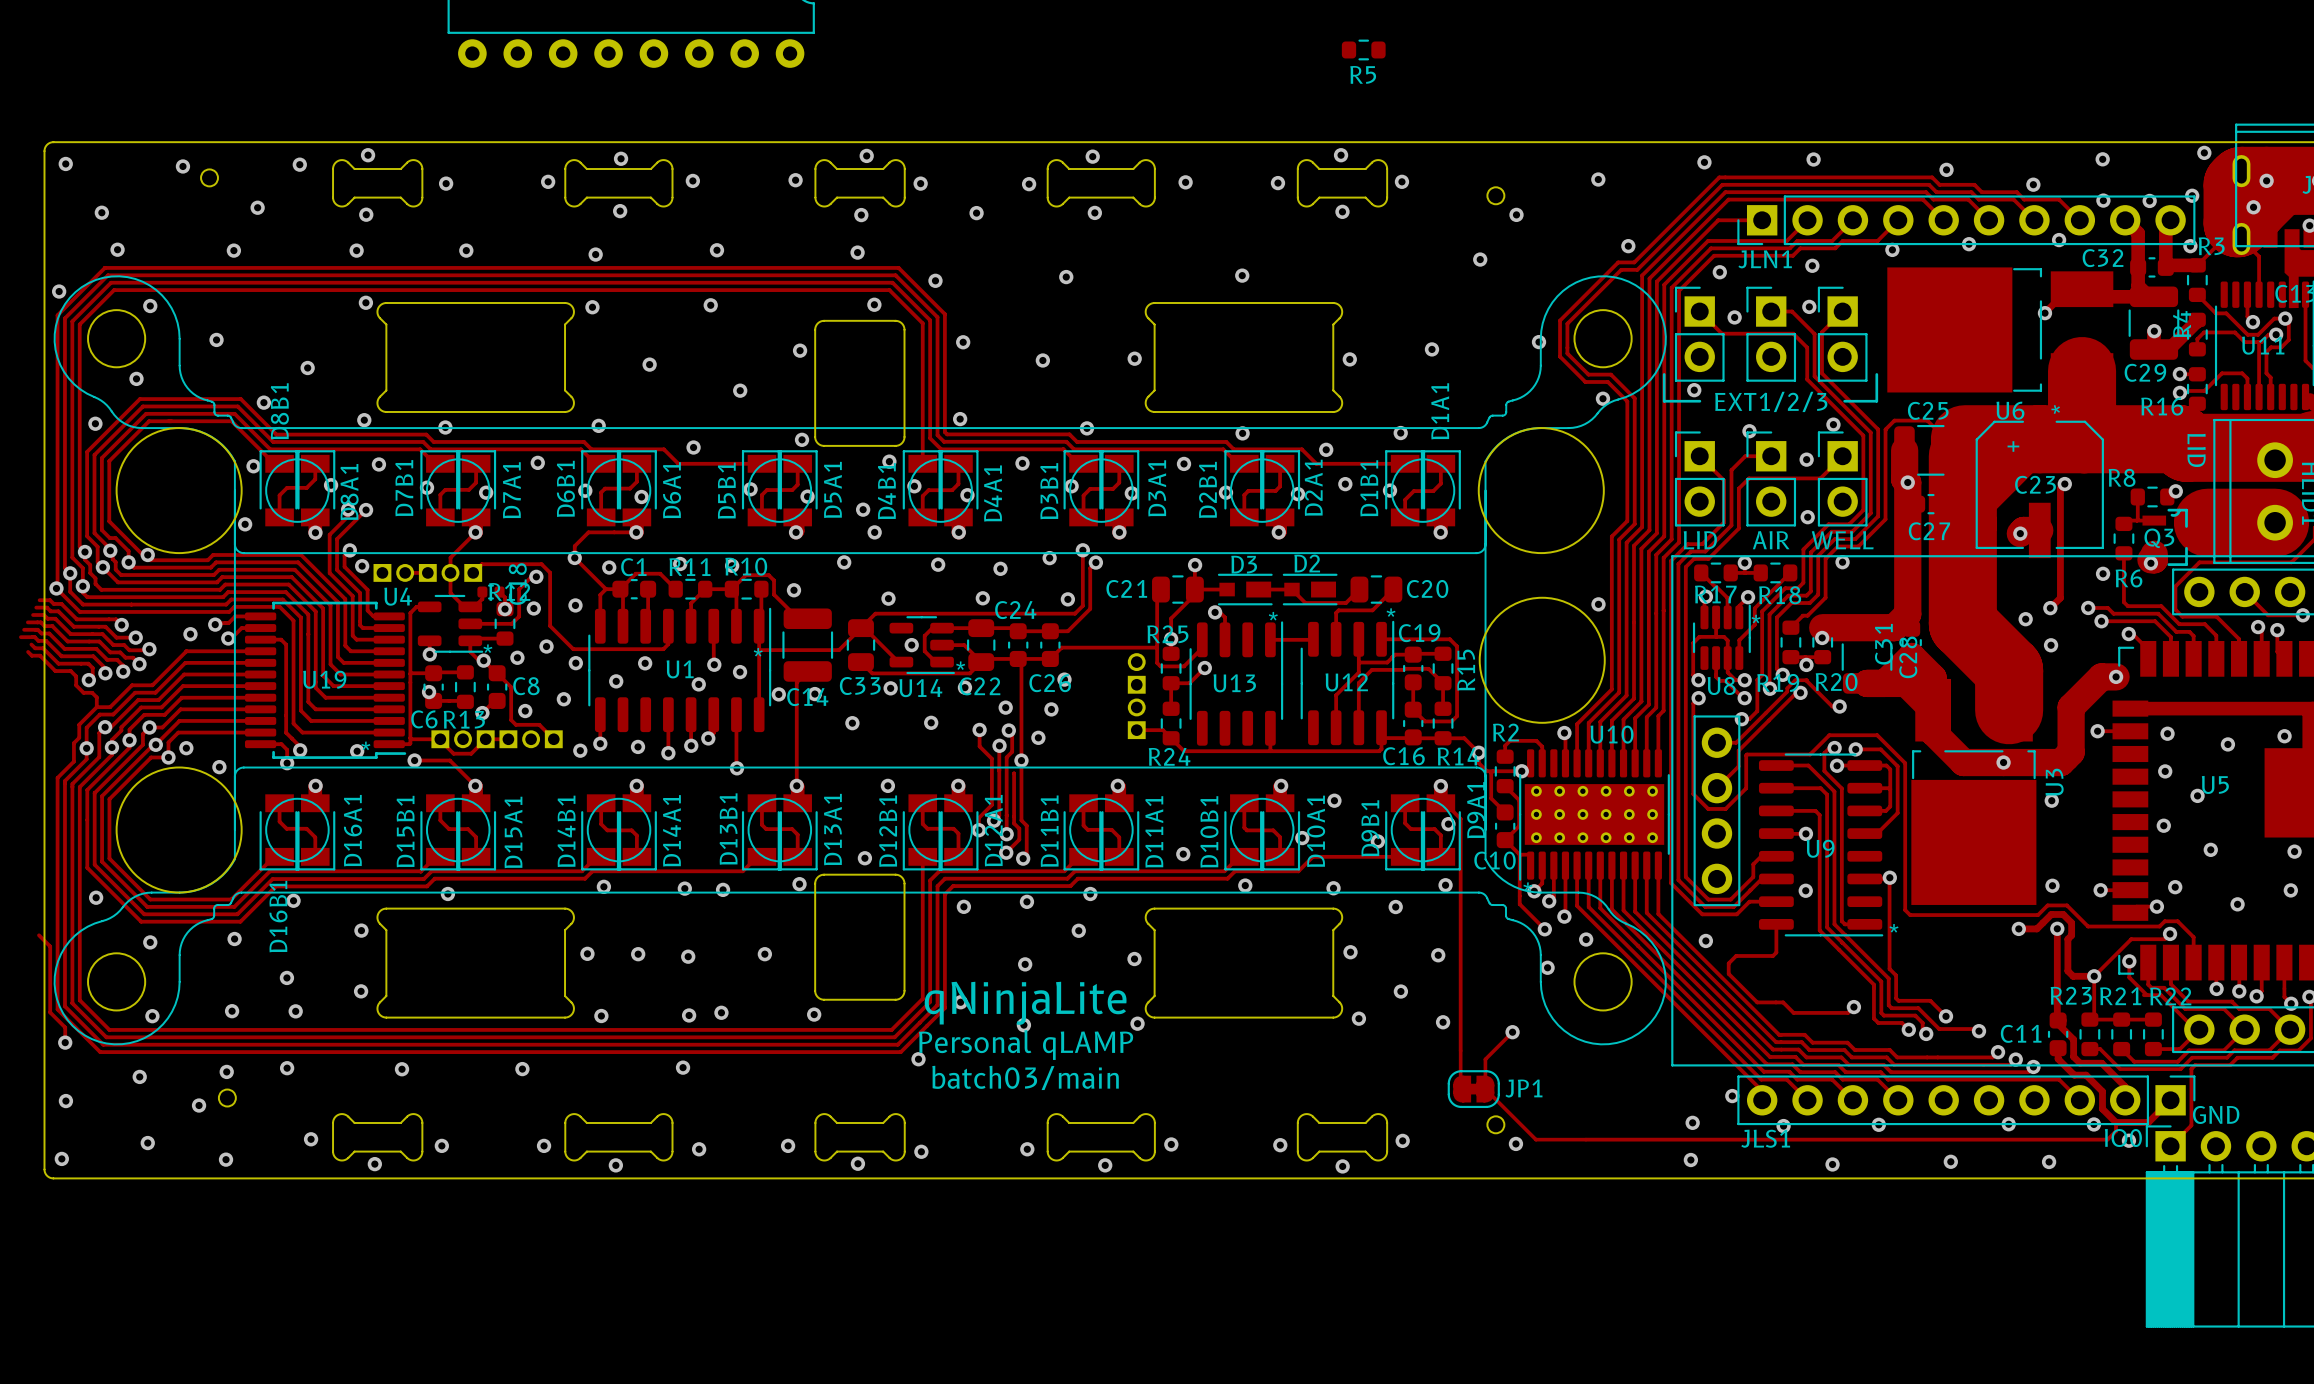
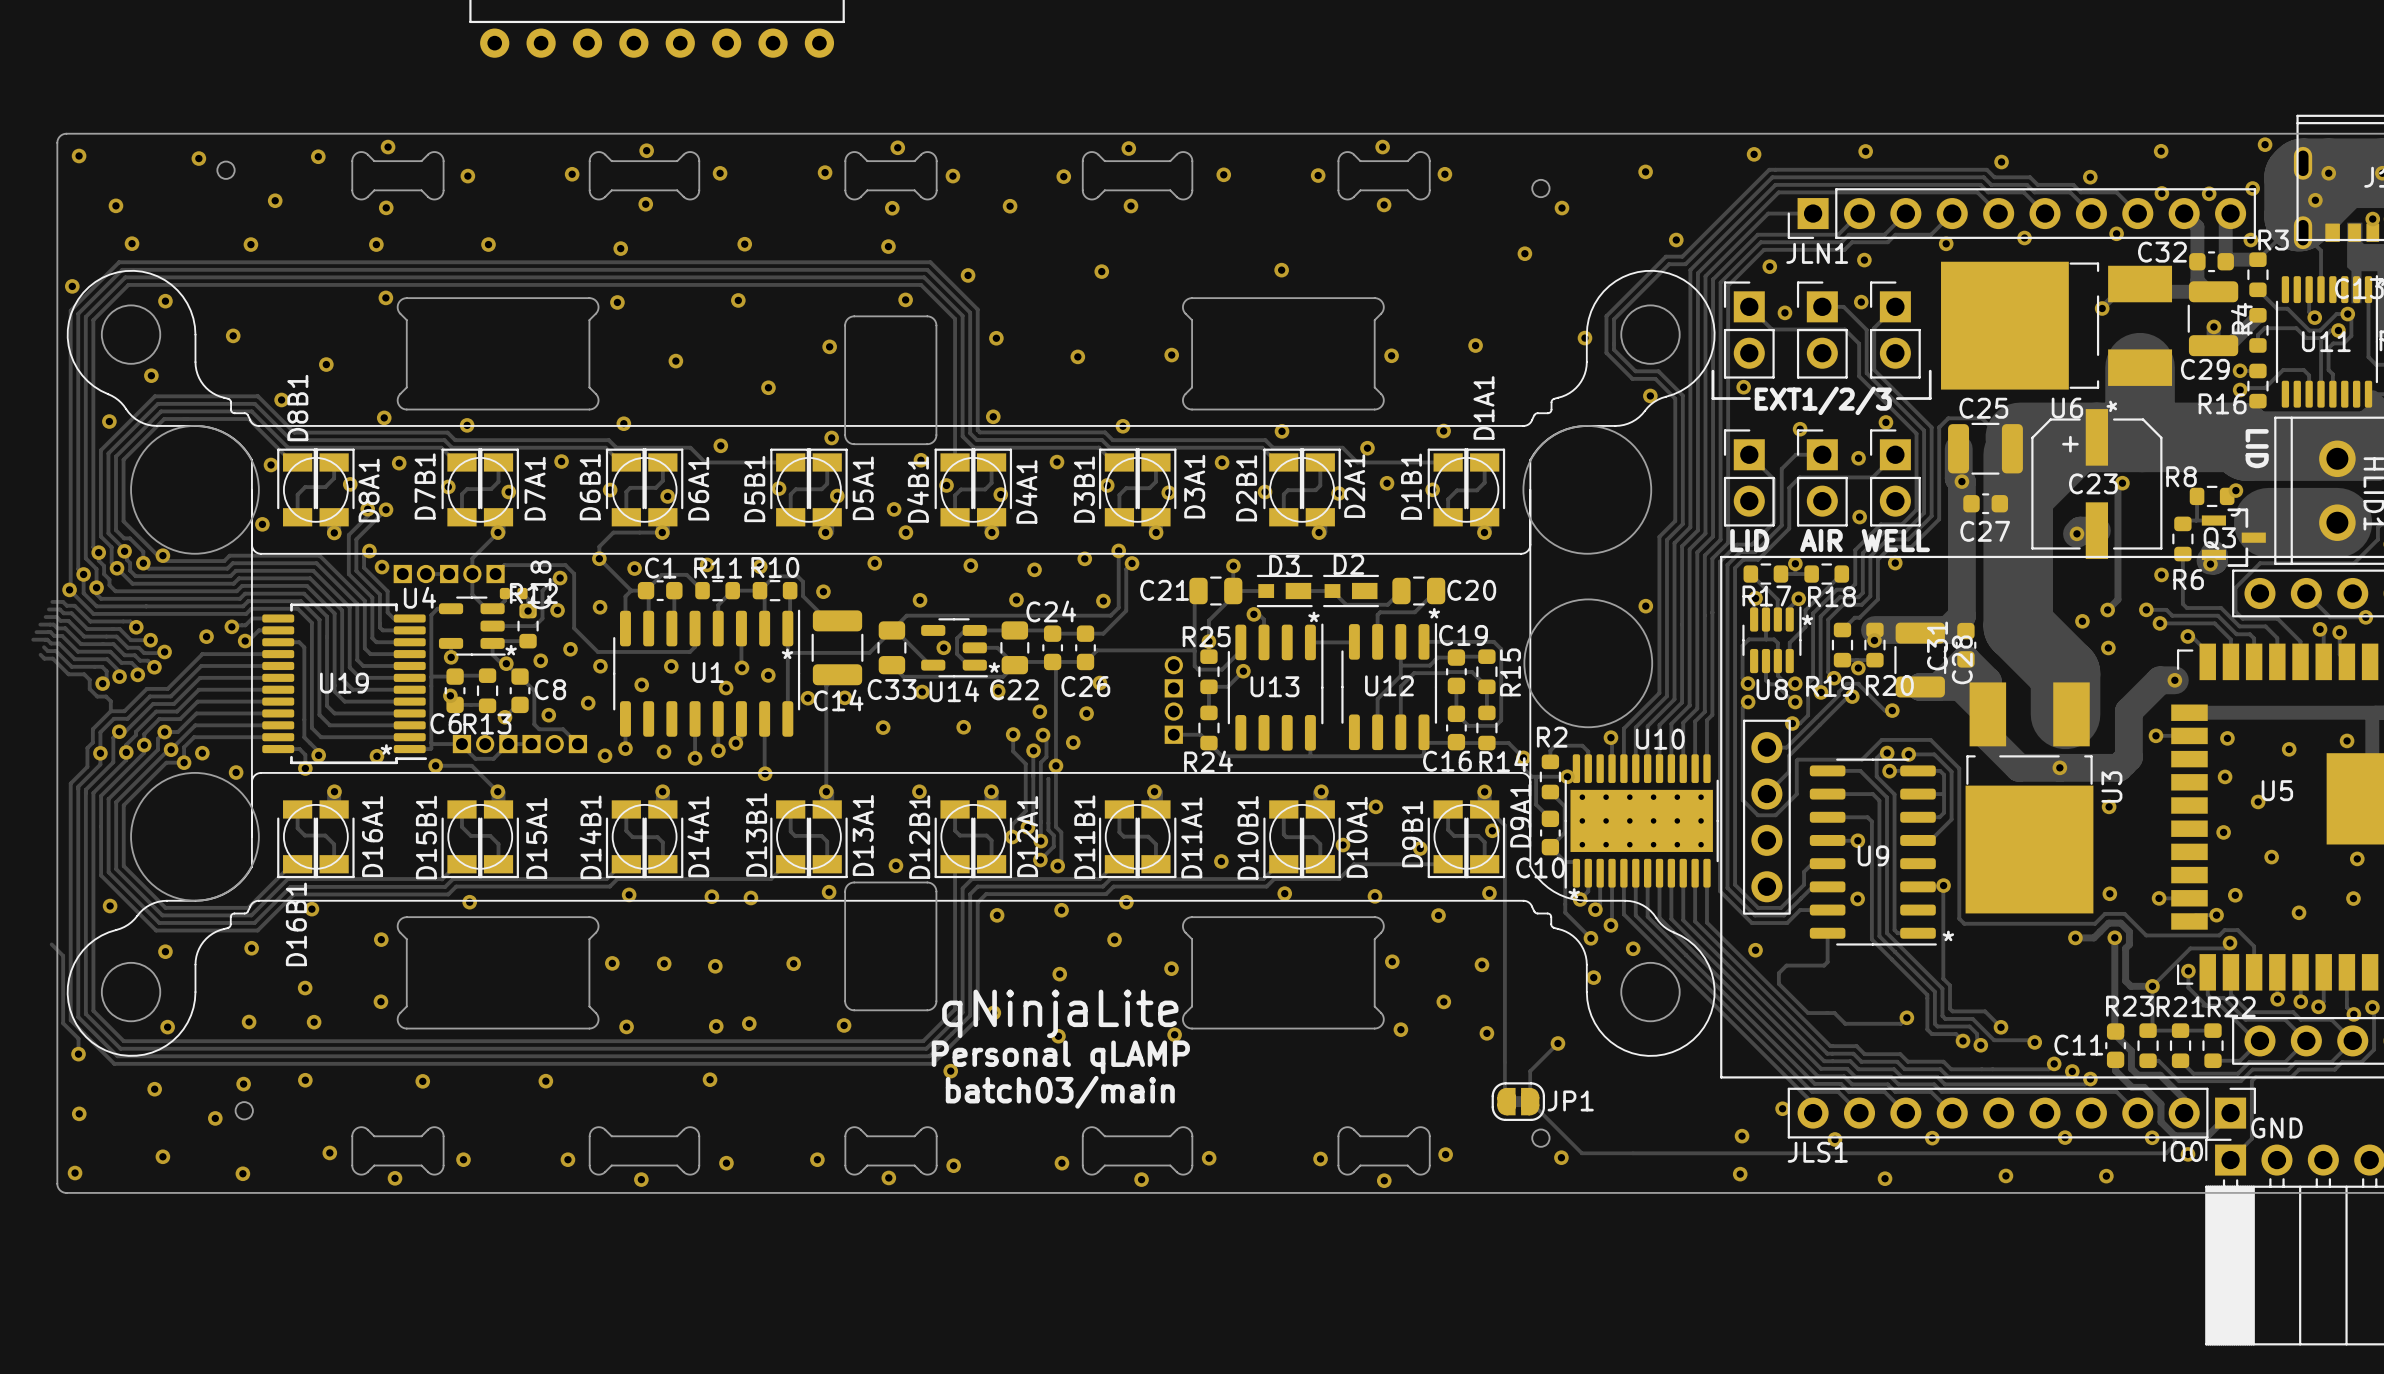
R5: (1363, 49) -> none

